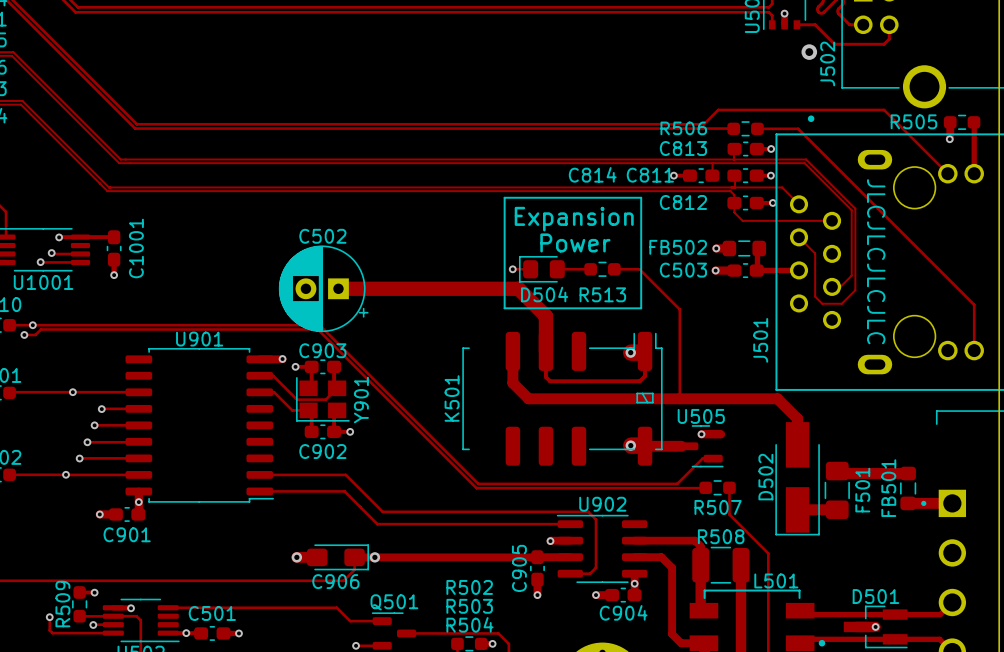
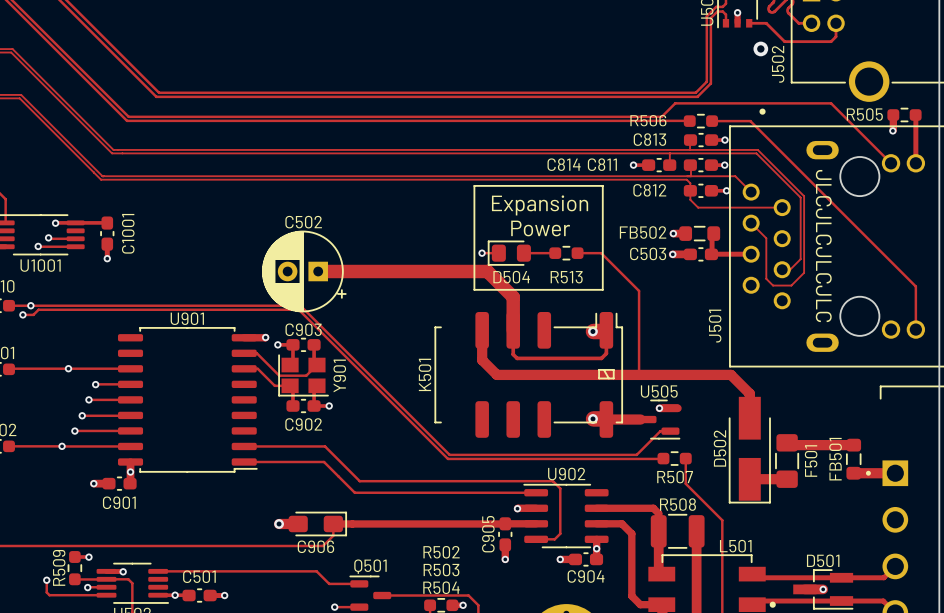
track: (77, 7) (761, 7) -> (73, 6) (159, 92) (695, 92) (706, 81) (706, 16) (716, 6)
track: (75, 12) (763, 12) -> (71, 11) (156, 96) (697, 96) (710, 83) (710, 18) (717, 11)
via: (374, 557) -> none

